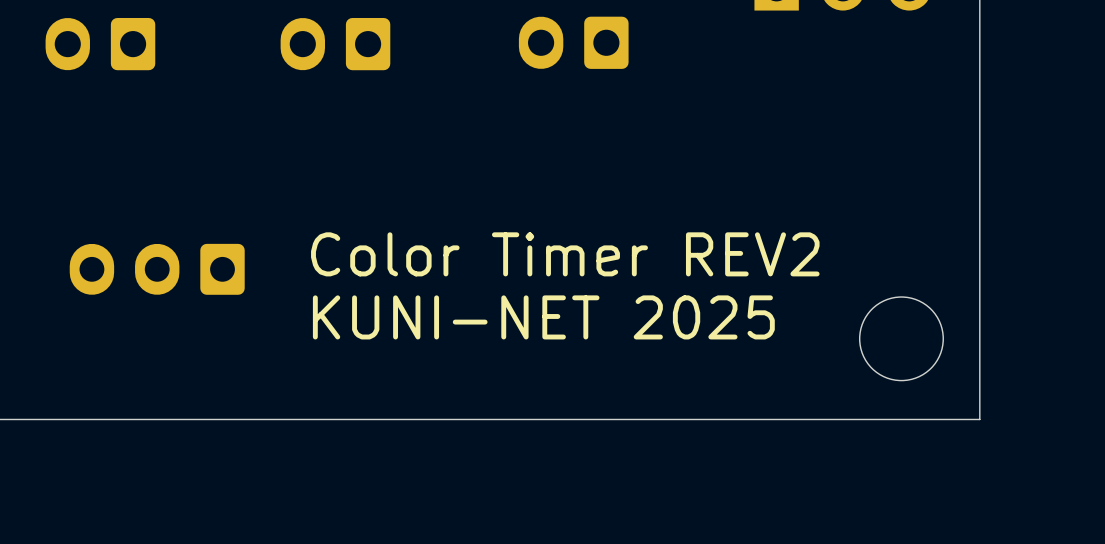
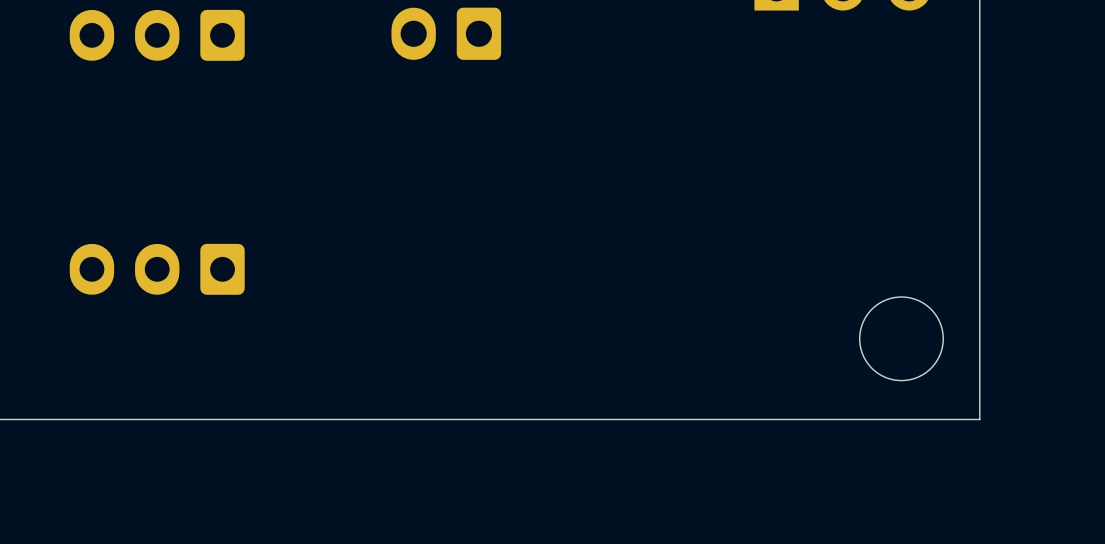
part: none -> (446, 33)
part: none -> (157, 35)
part: (573, 42) -> none
part: (100, 44) -> none
part: (335, 44) -> none
text: Color Timer REV2 (565, 254) -> none
text: KUNI-NET 2025 (543, 317) -> none

